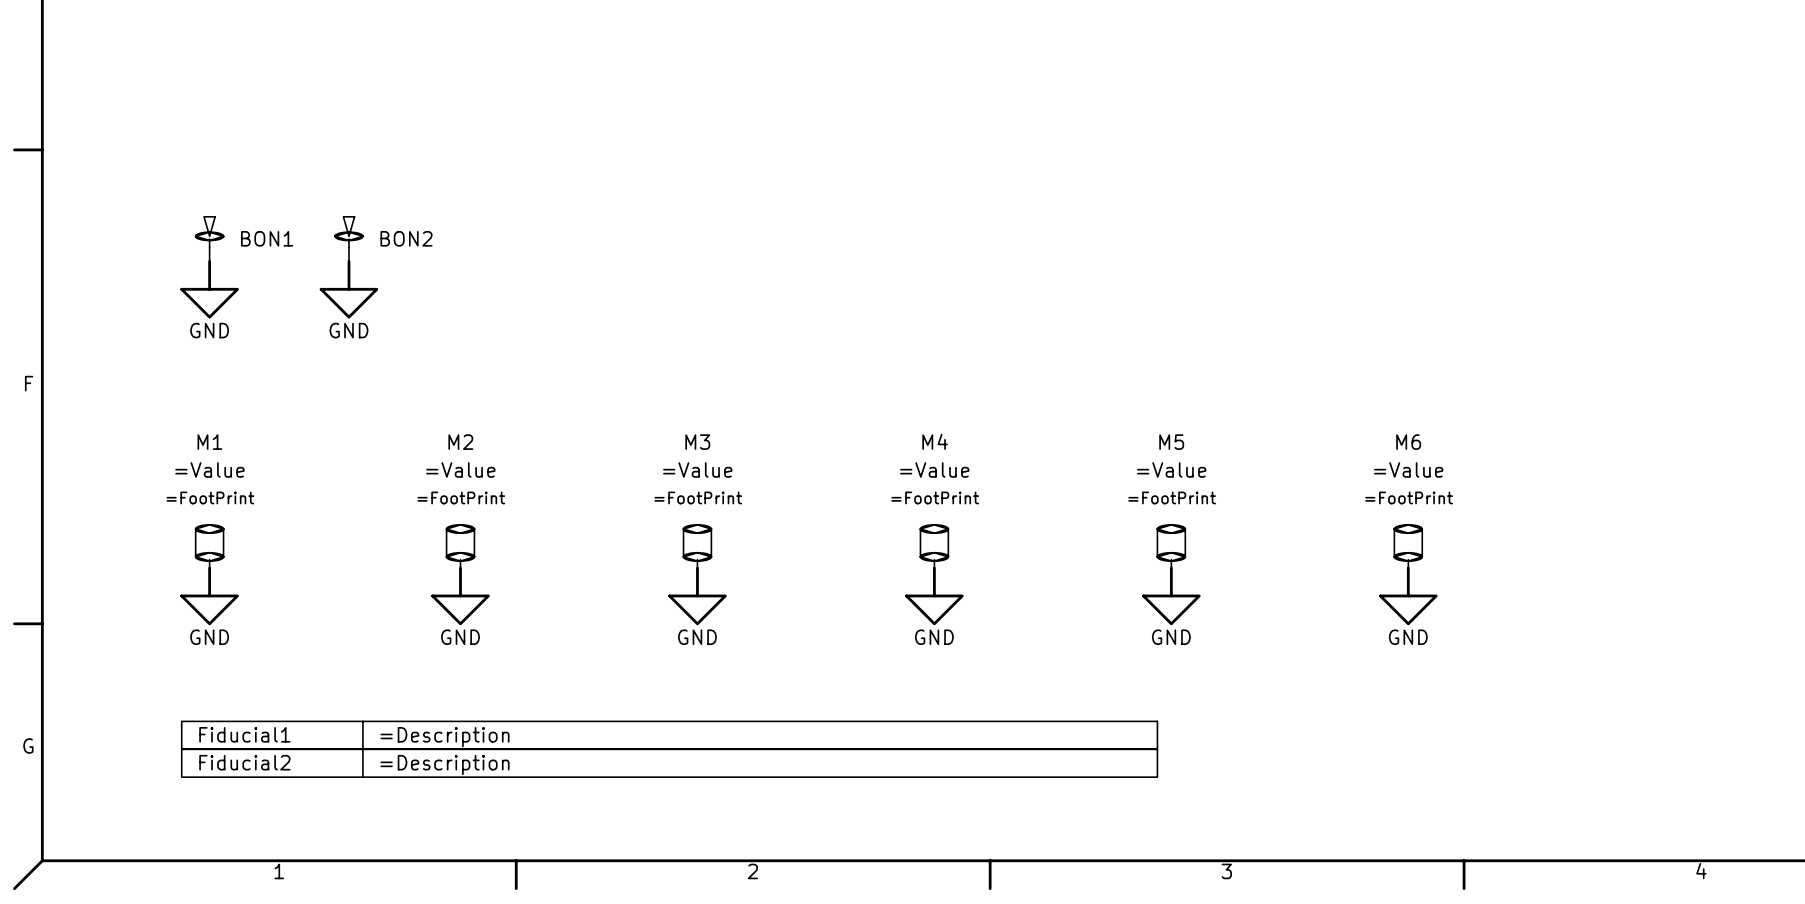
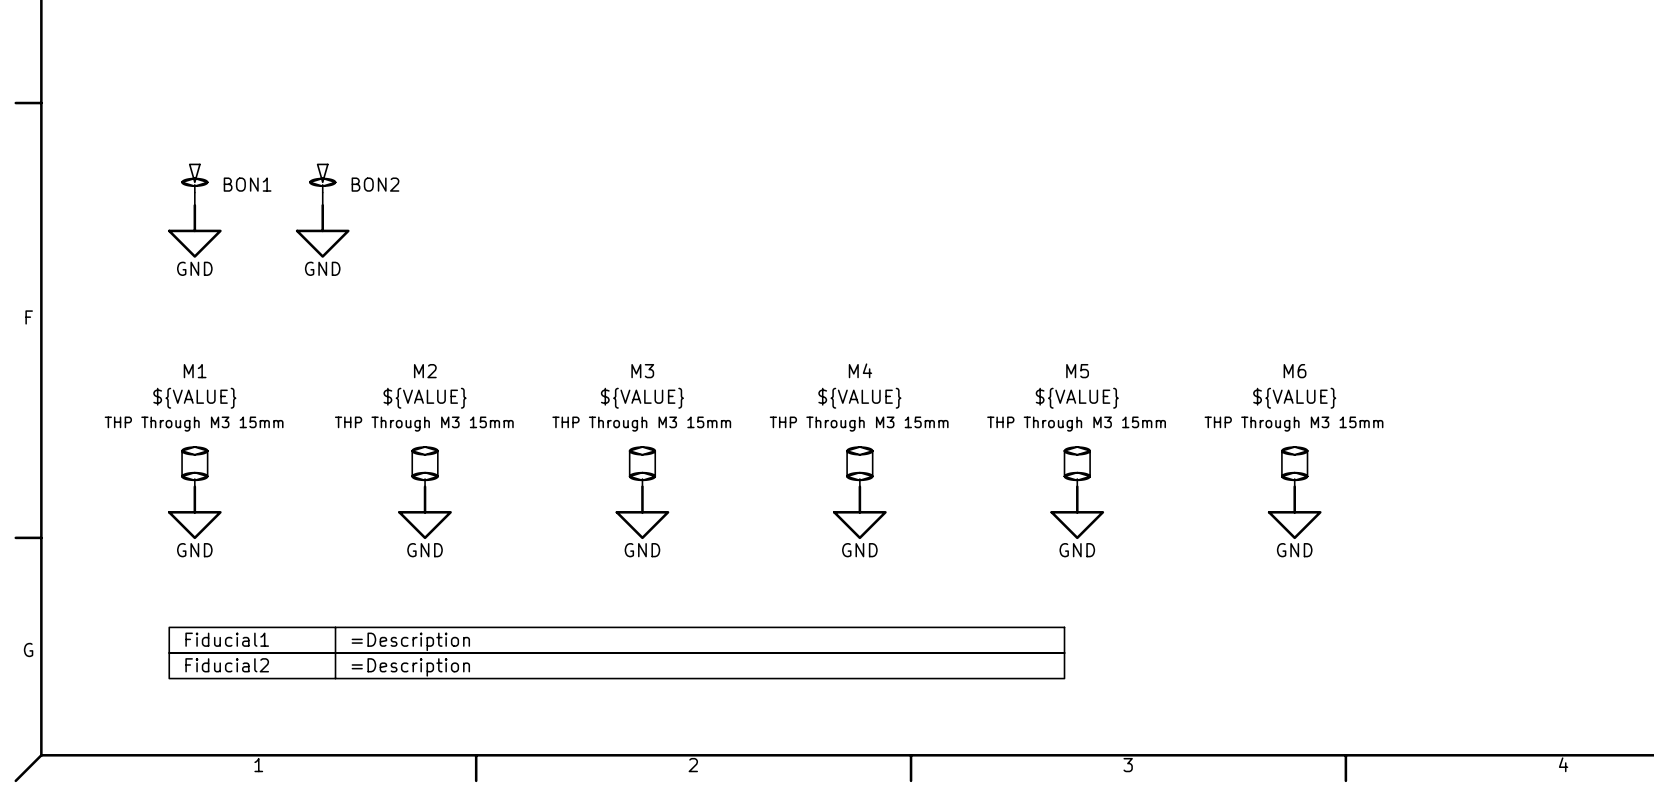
M1 text: =Value (209, 469) -> ${VALUE} (194, 398)
M2 text: =Value (460, 469) -> ${VALUE} (425, 398)
M3 text: =Value (697, 469) -> ${VALUE} (642, 398)
M4 text: =Value (934, 469) -> ${VALUE} (859, 398)
M5 text: =Value (1171, 469) -> ${VALUE} (1077, 398)
M6 text: =Value (1408, 469) -> ${VALUE} (1294, 398)
M1 text: =FootPrint (210, 497) -> none
M2 text: =FootPrint (461, 497) -> none
M3 text: =FootPrint (698, 497) -> none
M4 text: =FootPrint (935, 497) -> none
M5 text: =FootPrint (1172, 497) -> none
M6 text: =FootPrint (1409, 497) -> none
M1 text: none -> THP Through M3 15mm (194, 424)
M2 text: none -> THP Through M3 15mm (424, 424)
M3 text: none -> THP Through M3 15mm (641, 424)
M4 text: none -> THP Through M3 15mm (859, 424)
M5 text: none -> THP Through M3 15mm (1076, 424)
M6 text: none -> THP Through M3 15mm (1293, 424)

